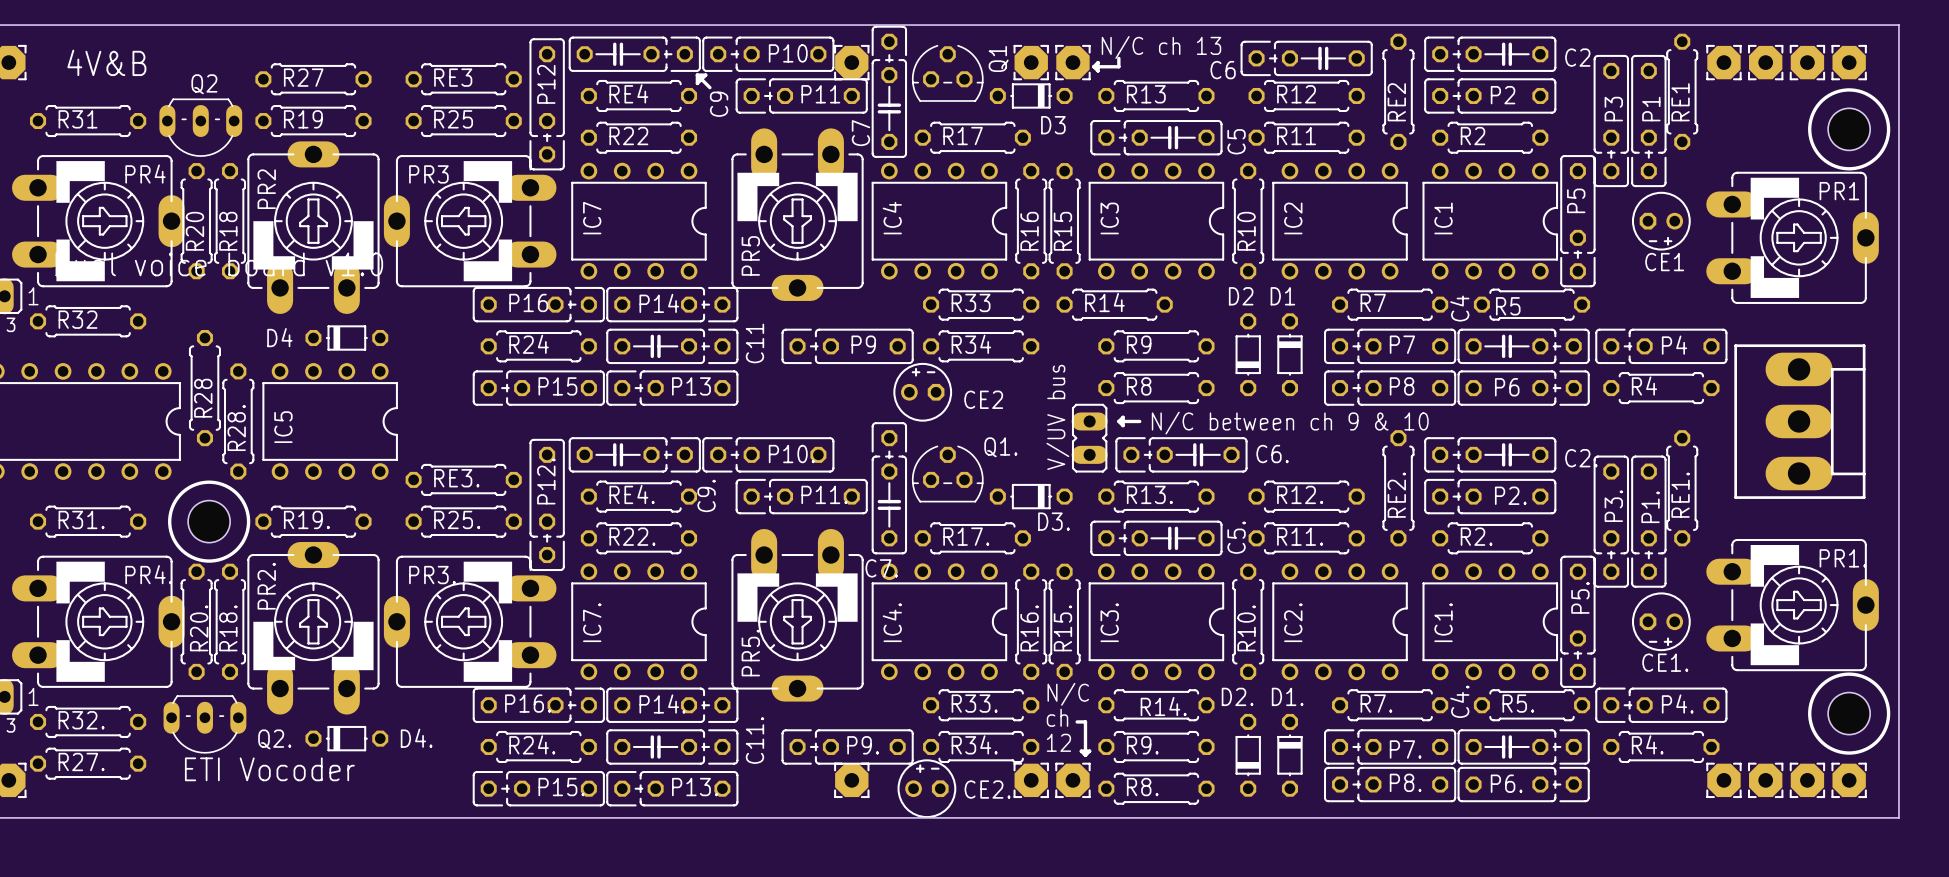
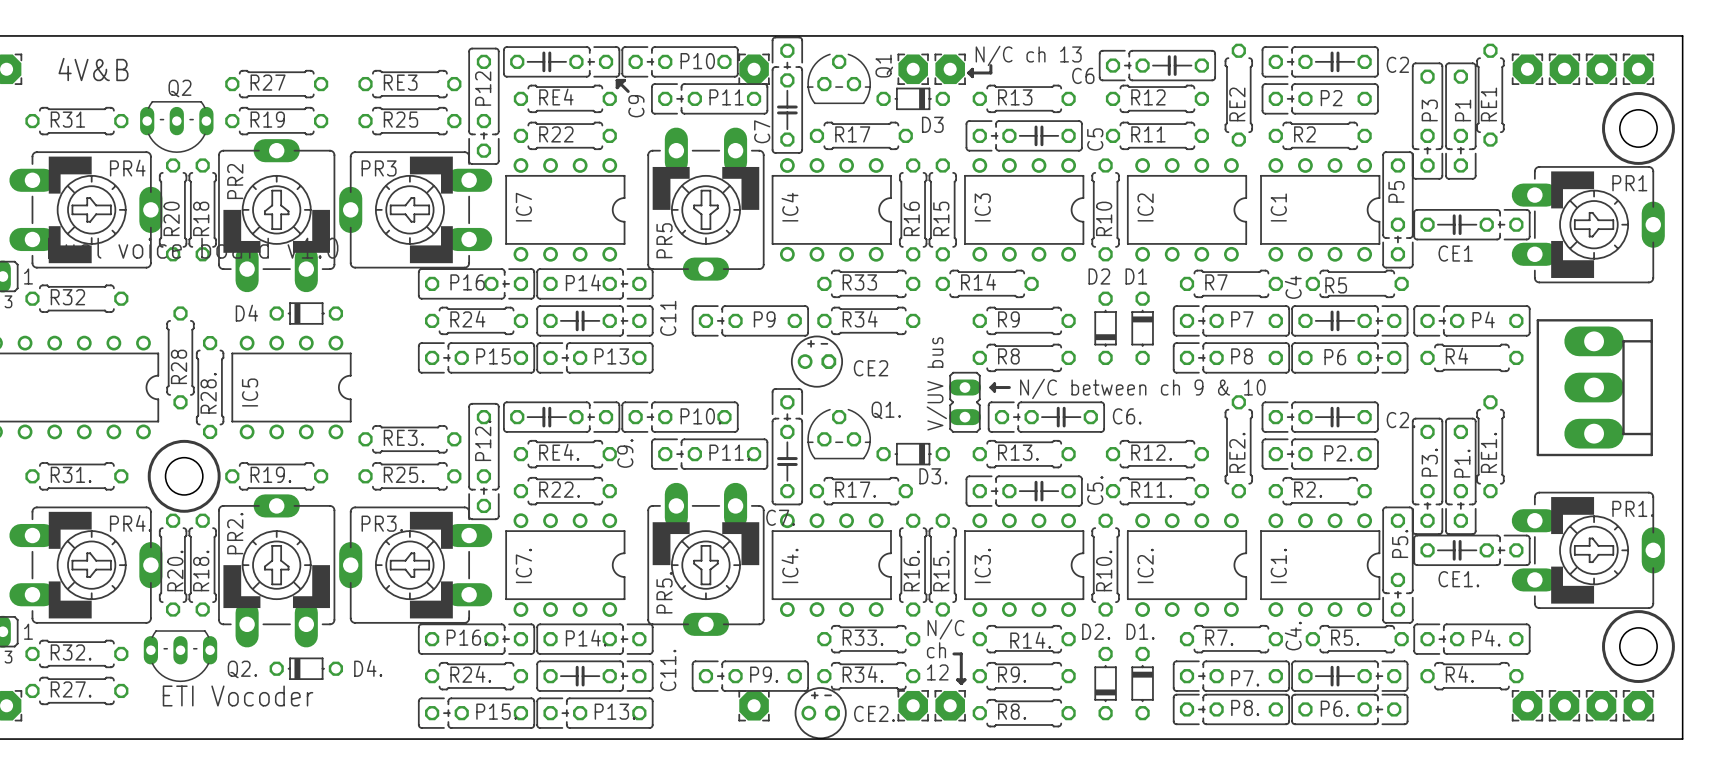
CE1 footprint: [1631, 191, 1691, 251] -> [1413, 209, 1531, 241]
CE1. footprint: [1631, 592, 1691, 652] -> [1413, 534, 1531, 567]

